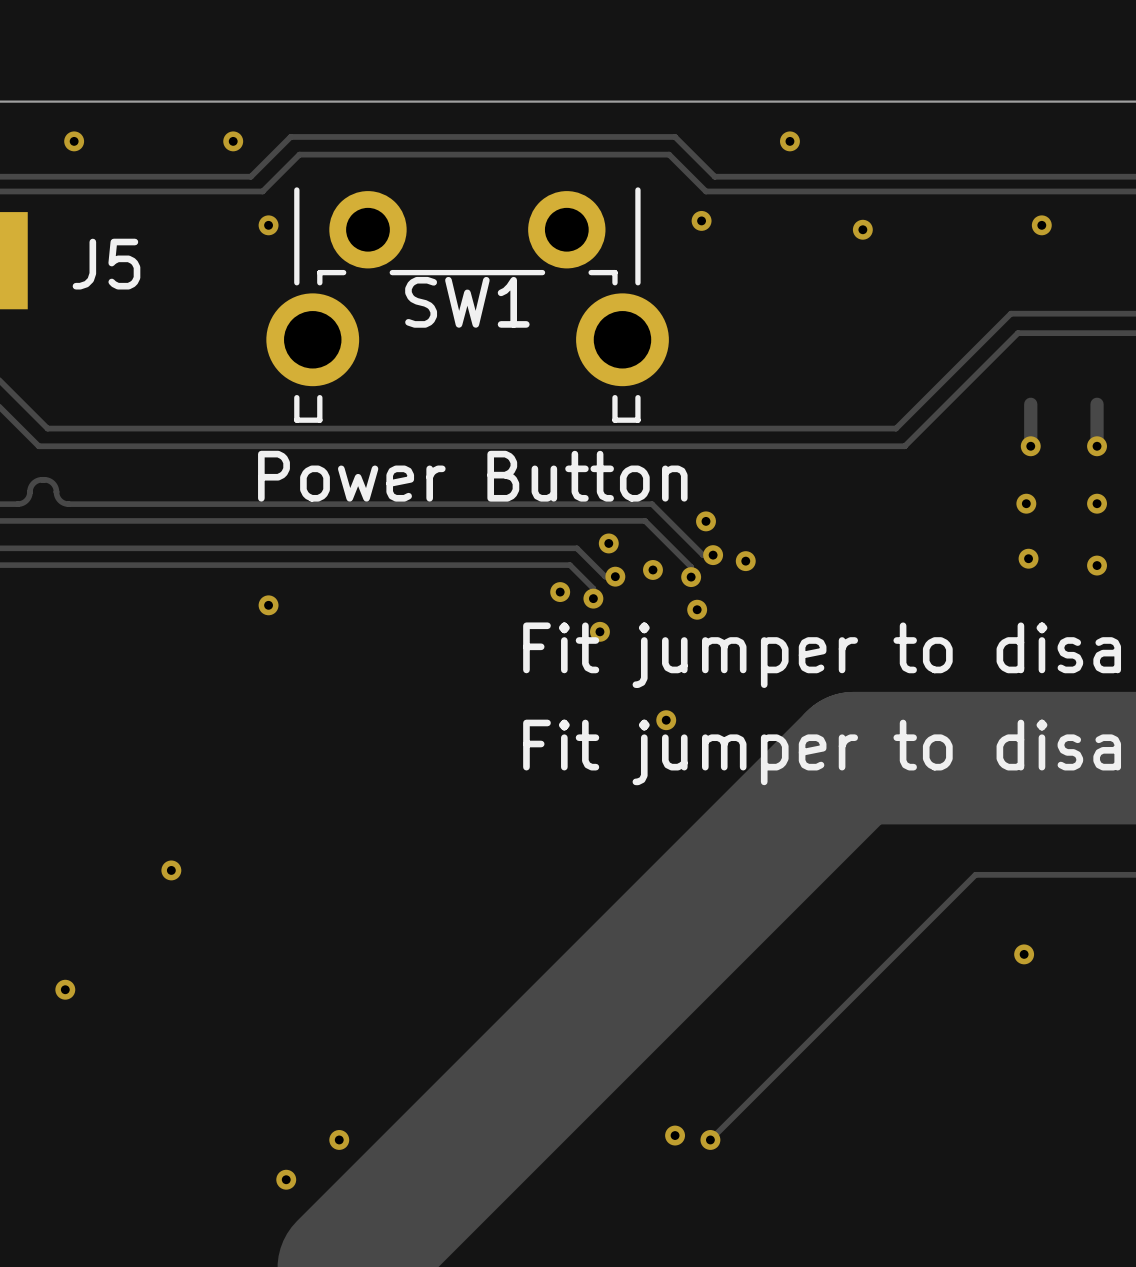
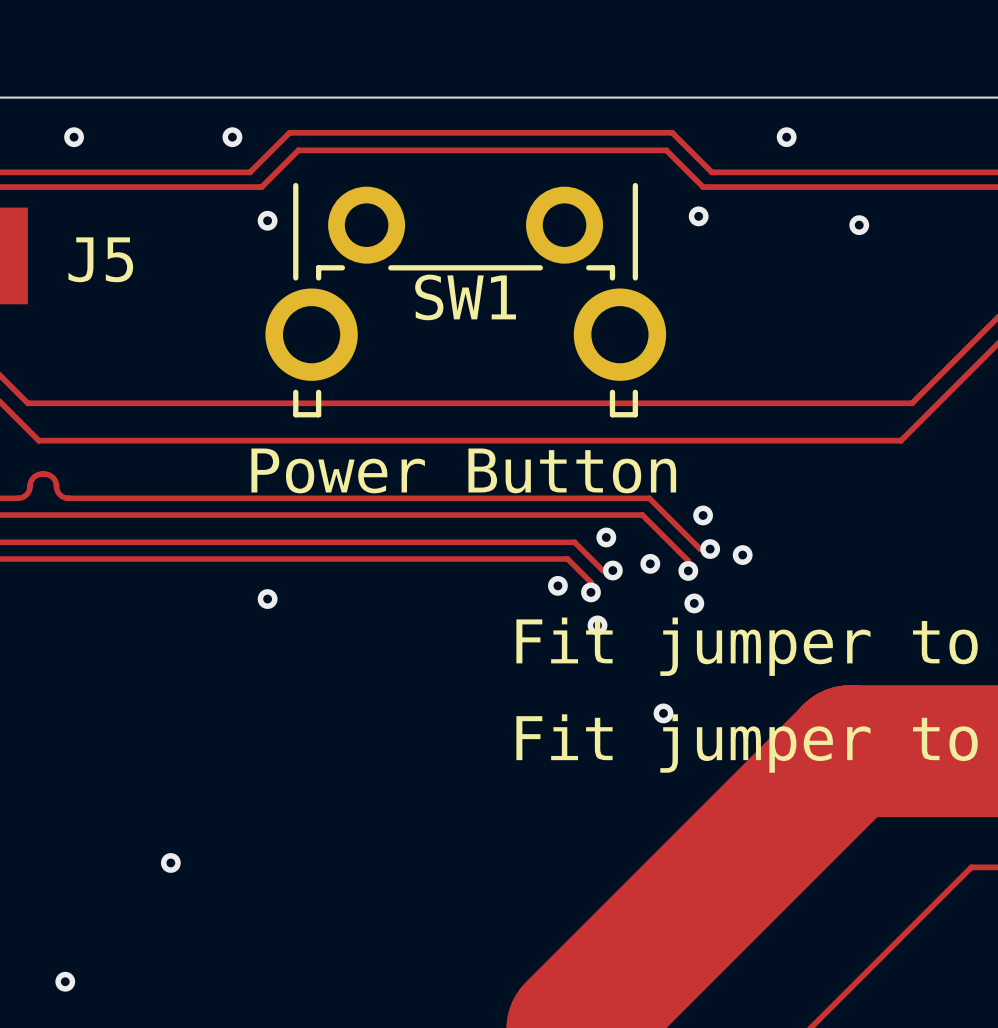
track: (27, 408) (47, 428) (895, 428) (915, 408) -> (27, 403) (912, 403)

